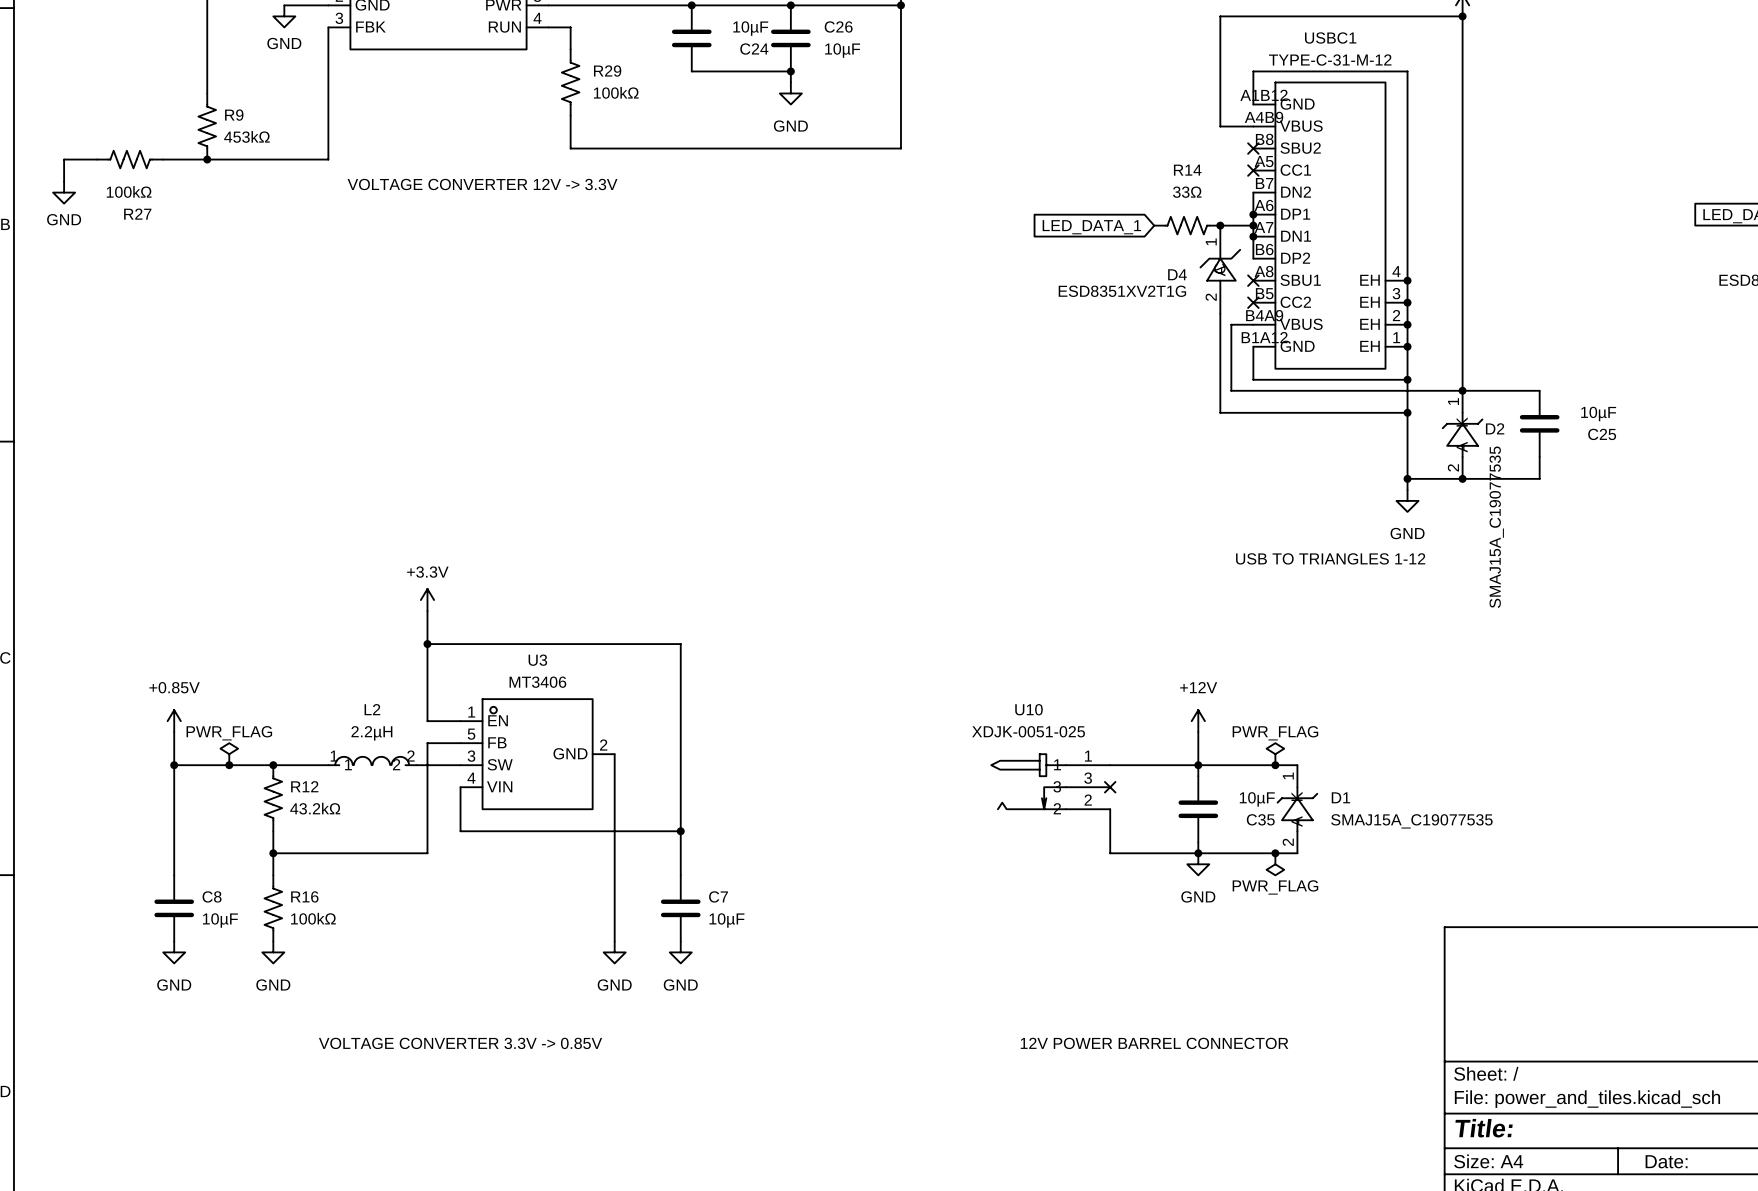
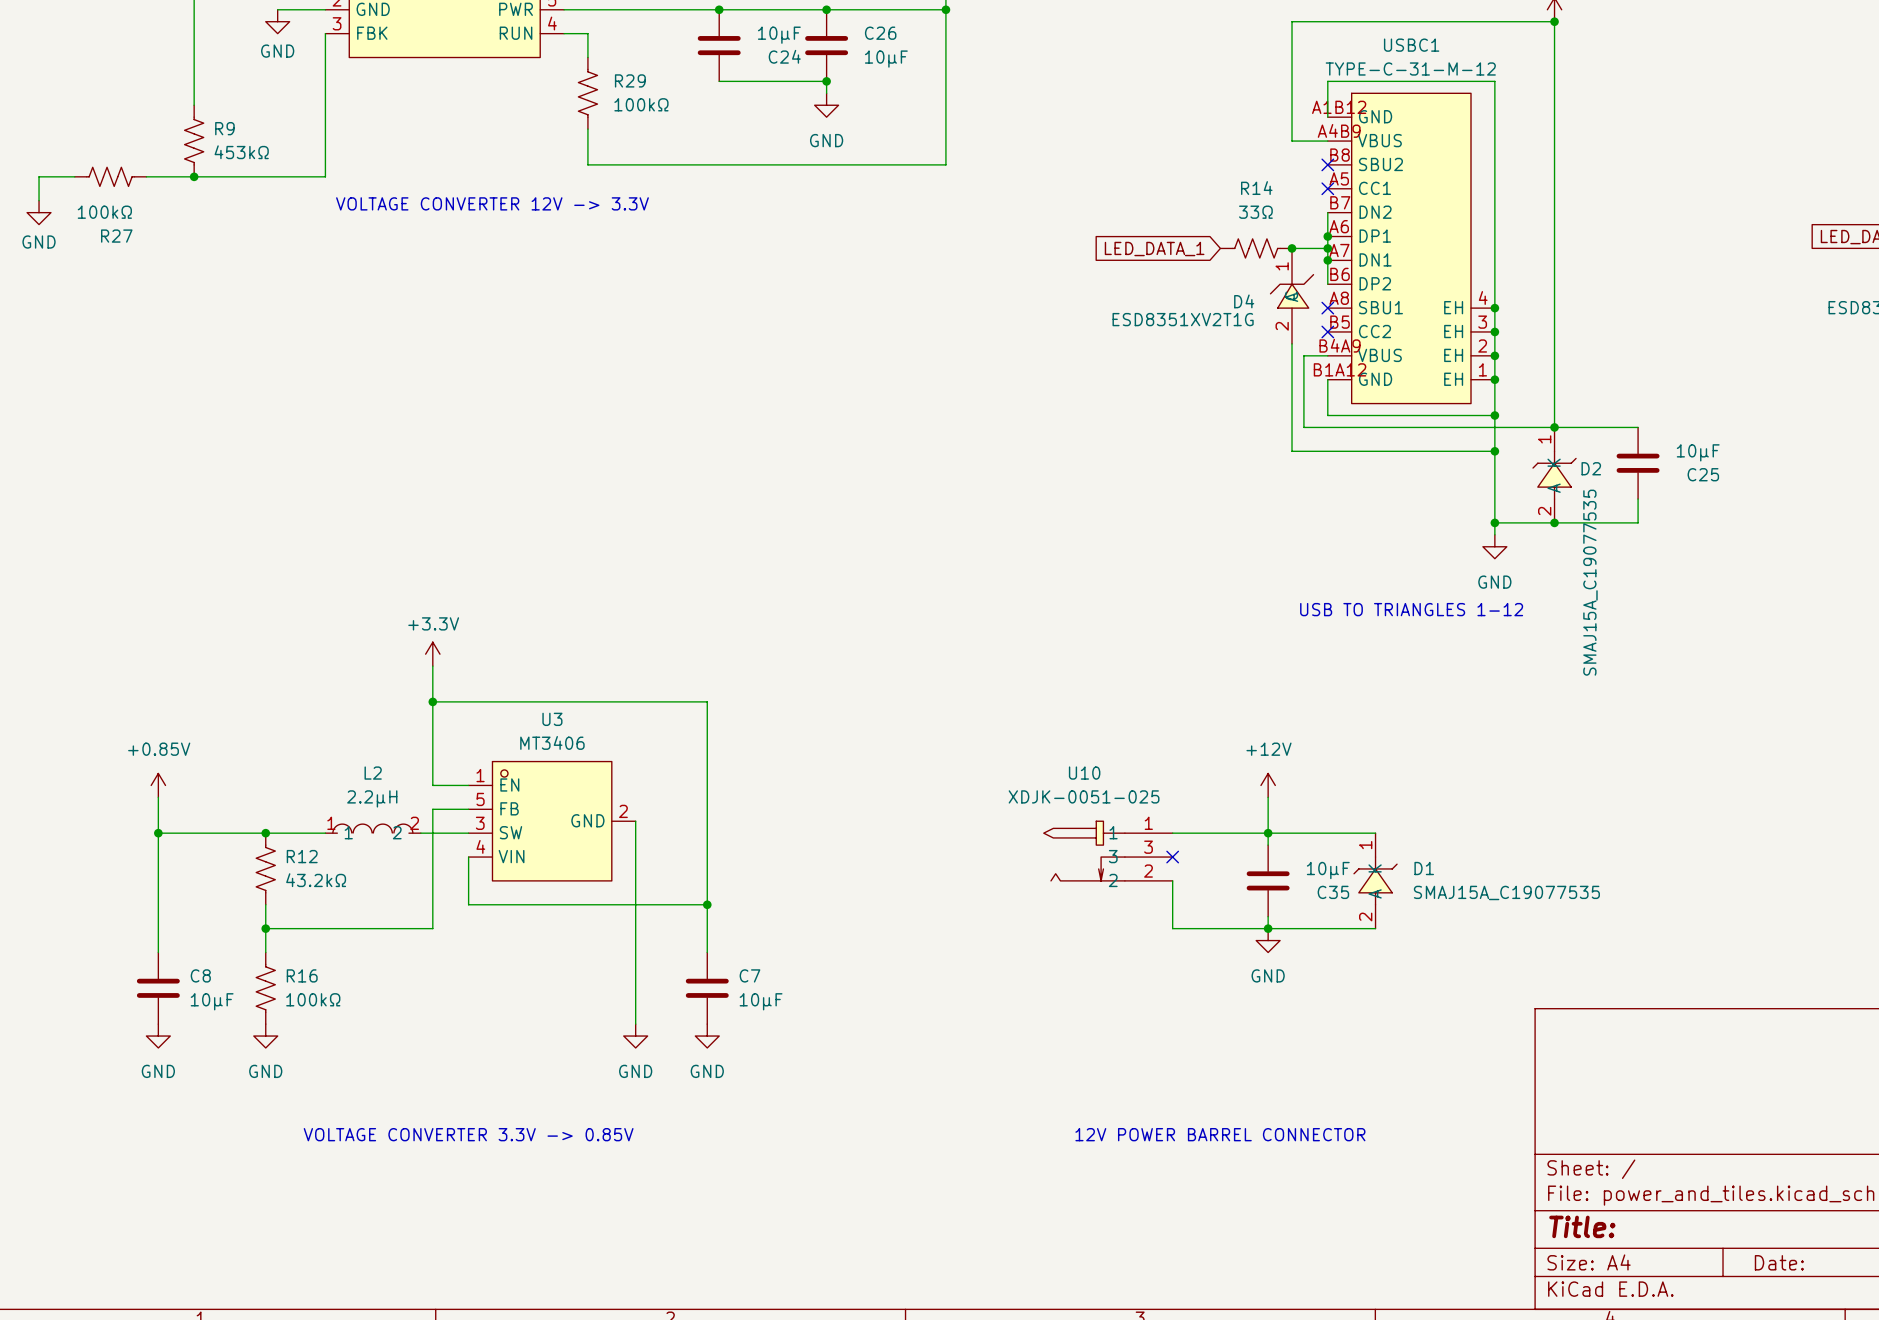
power symbol: PWR_FLAG (229, 754) -> none
power symbol: PWR_FLAG (1275, 754) -> none
junction: (229, 765) -> none
junction: (1275, 765) -> none
junction: (1275, 853) -> none
power symbol: PWR_FLAG (1275, 864) -> none

